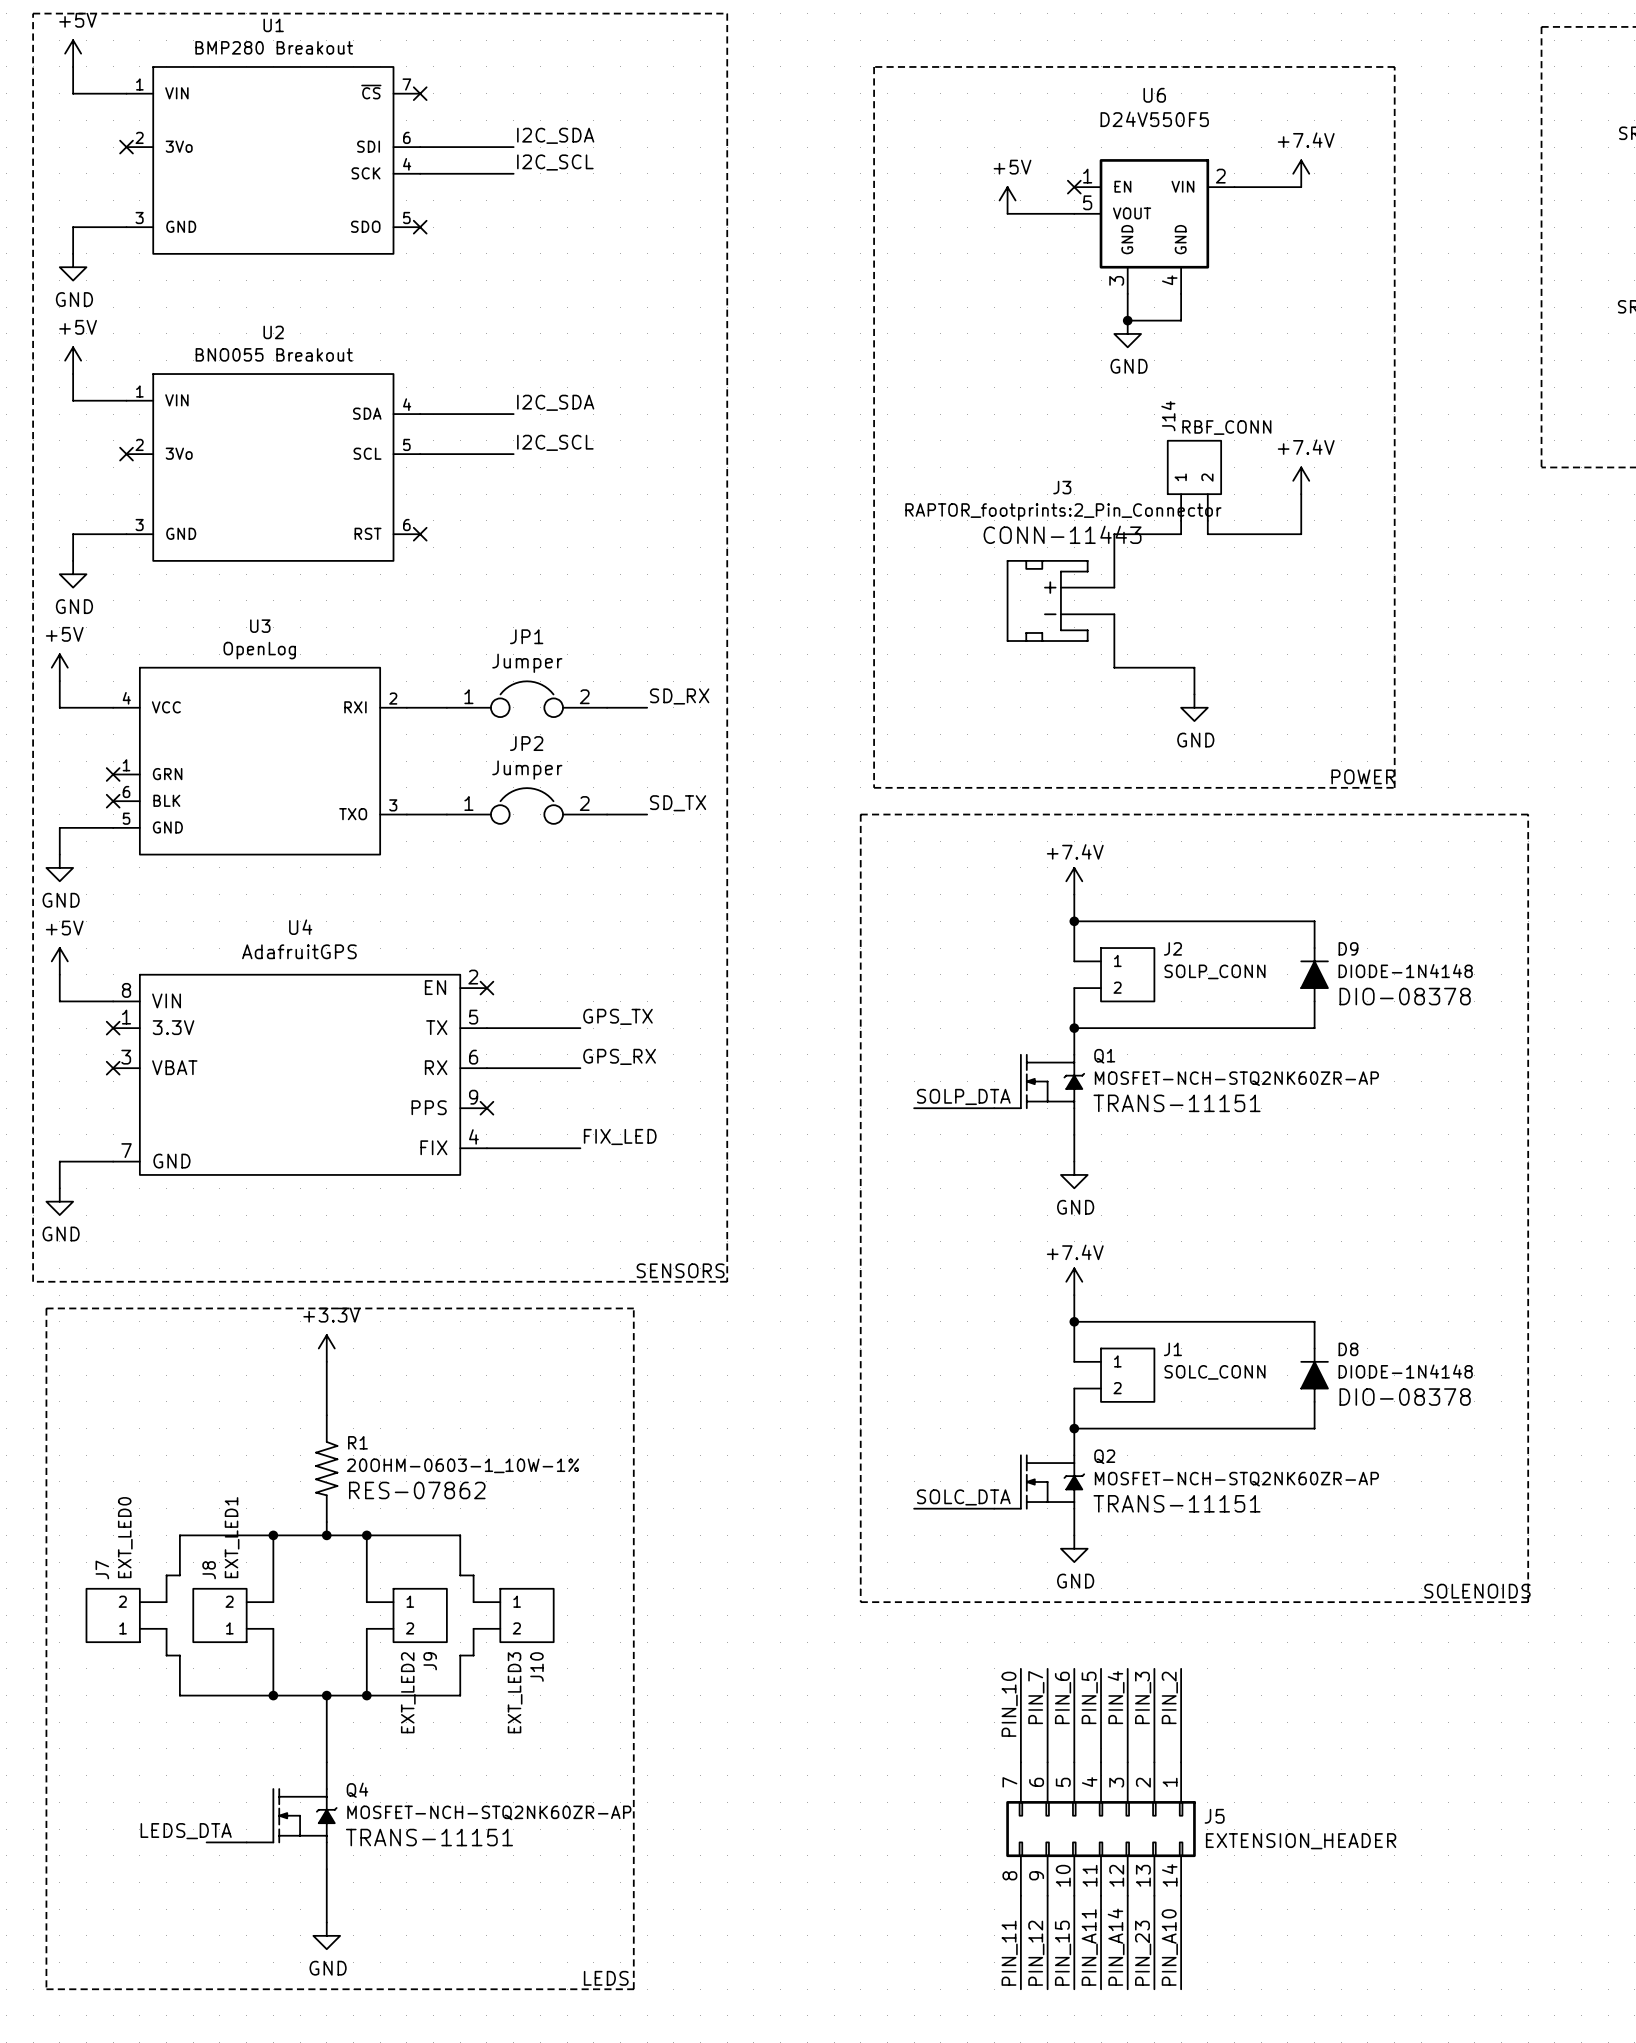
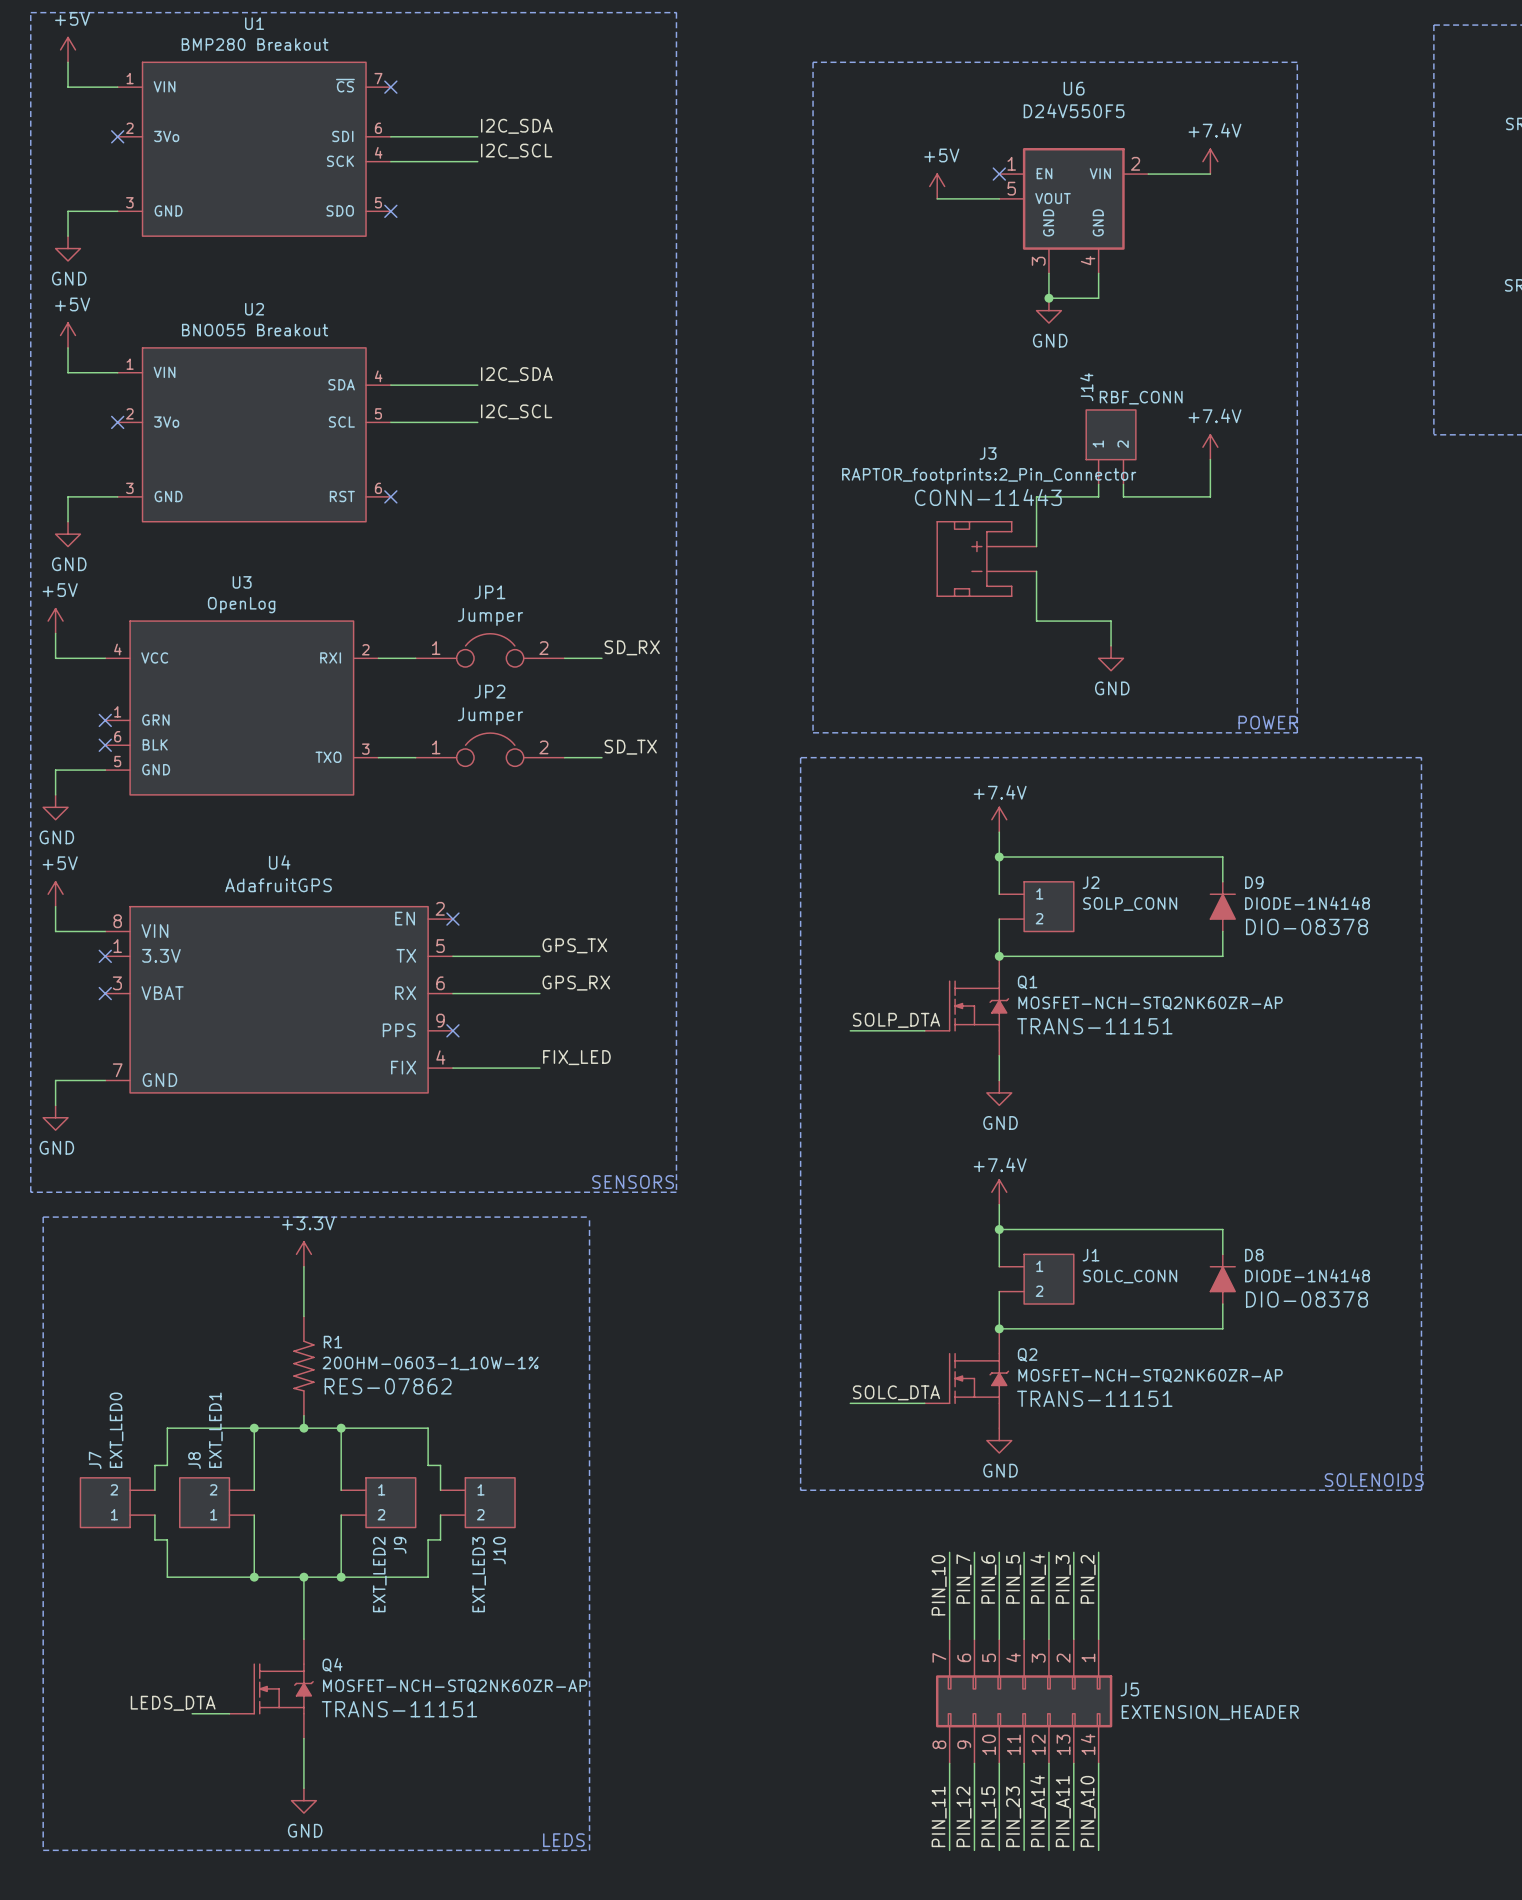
label: PIN_A11 (1089, 1947) -> PIN_23 (1013, 1816)
label: PIN_23 (1143, 1953) -> PIN_A11 (1063, 1811)

